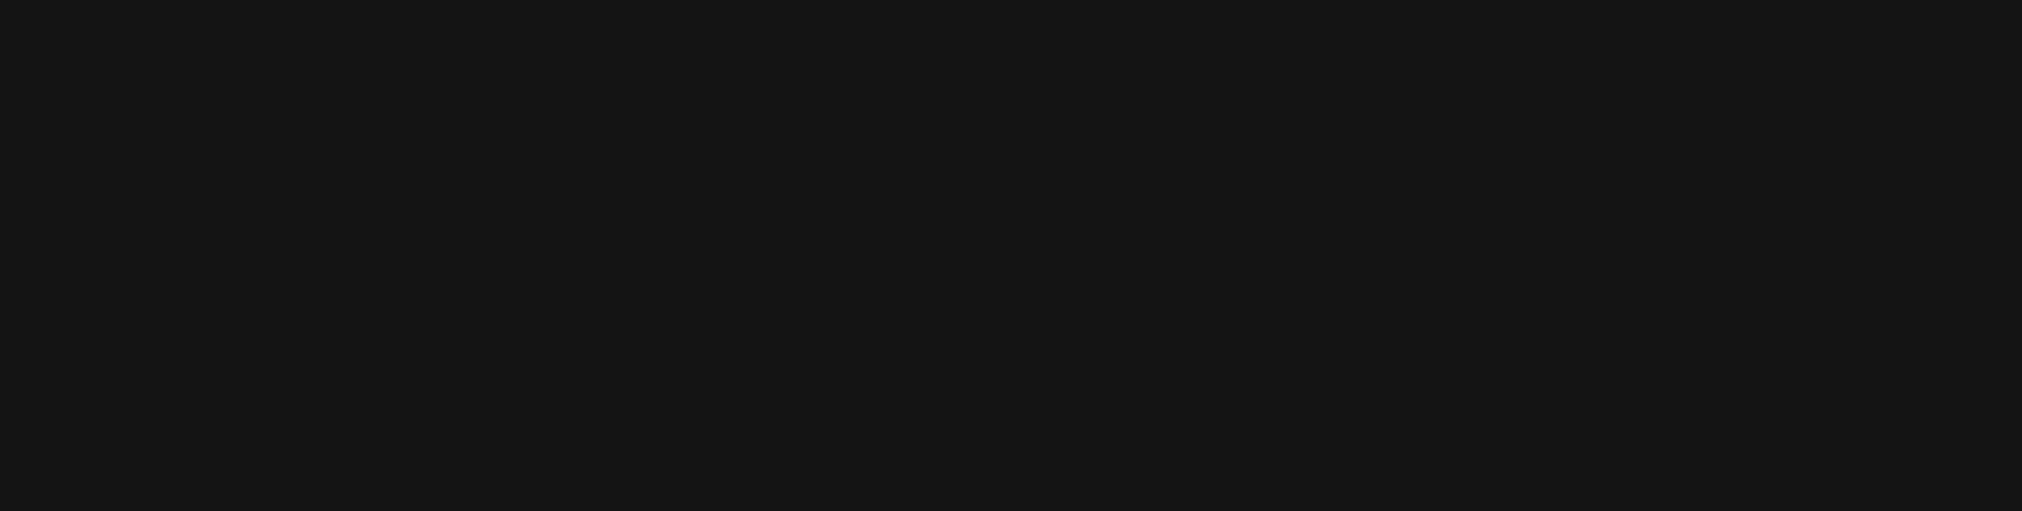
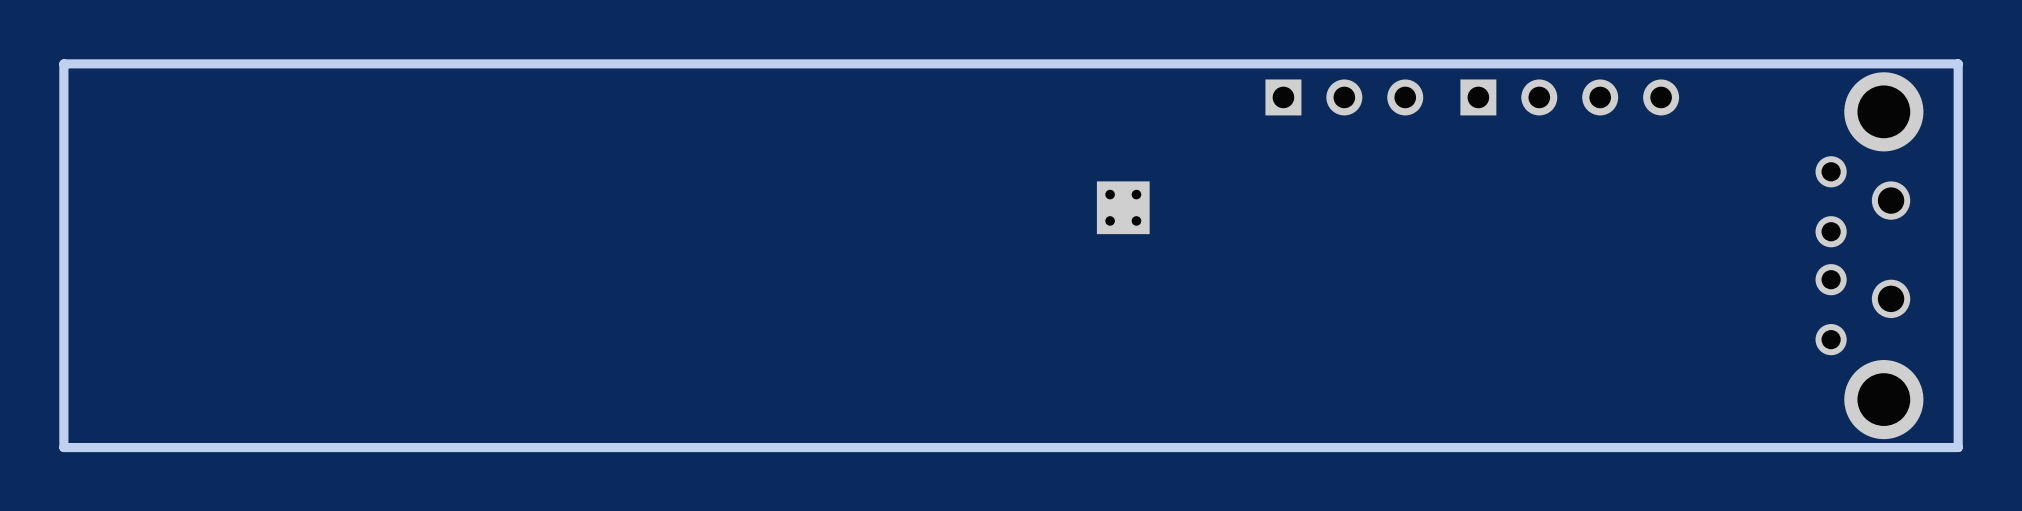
board edge: none -> (1958, 63) (63, 63) (63, 447) (1958, 447) (1958, 63)
part: none -> (1344, 97)
part: none -> (1569, 97)
part: none -> (1123, 207)
part: none -> (1869, 255)

